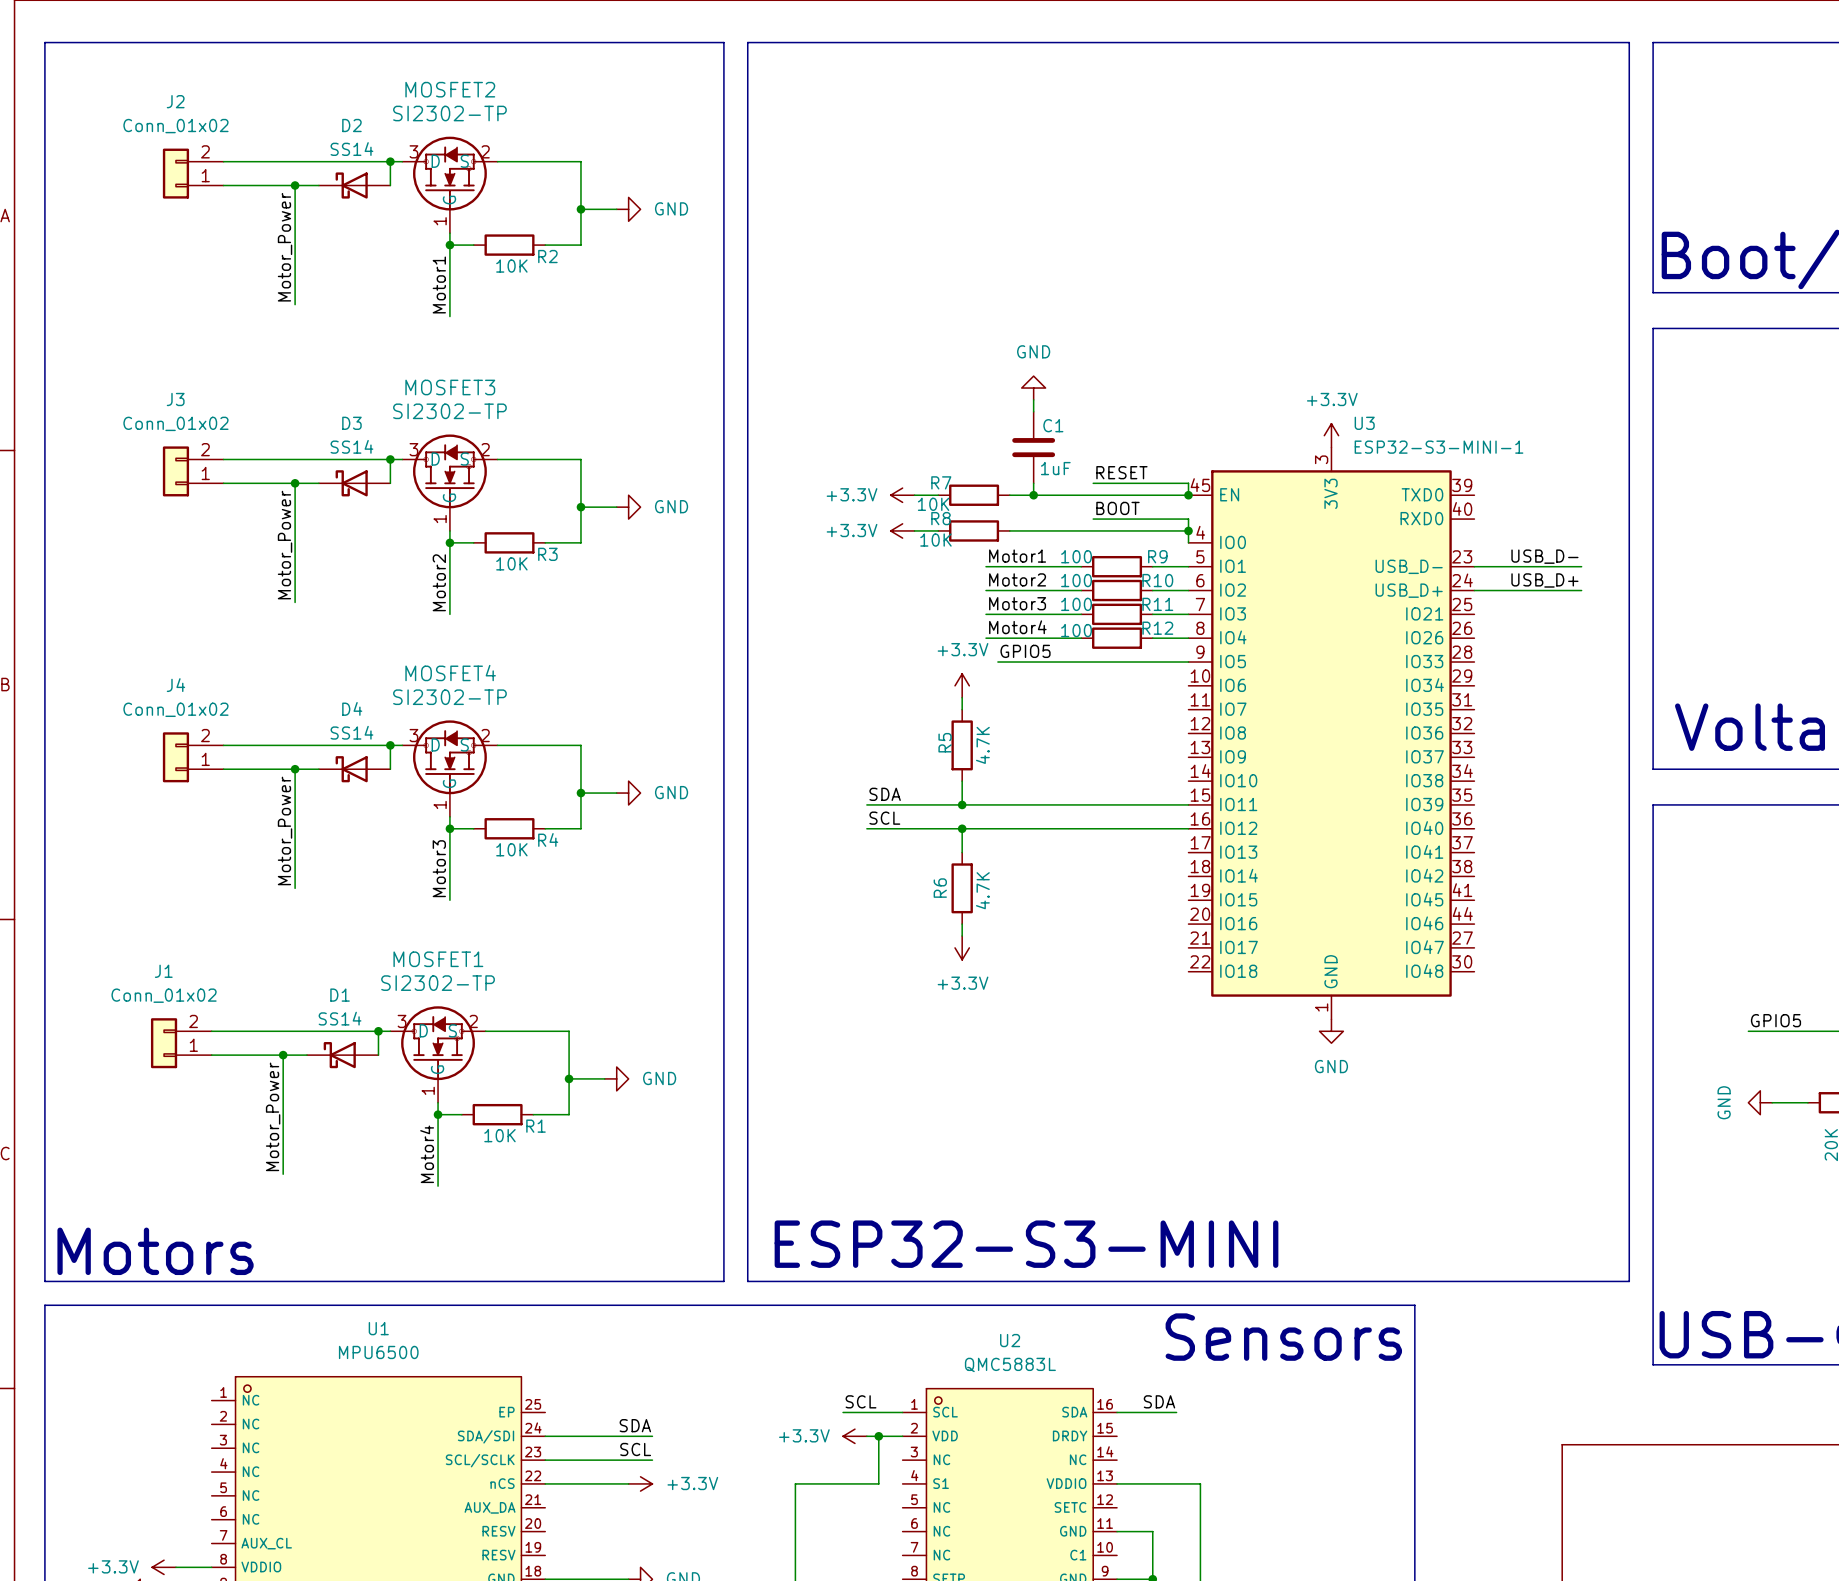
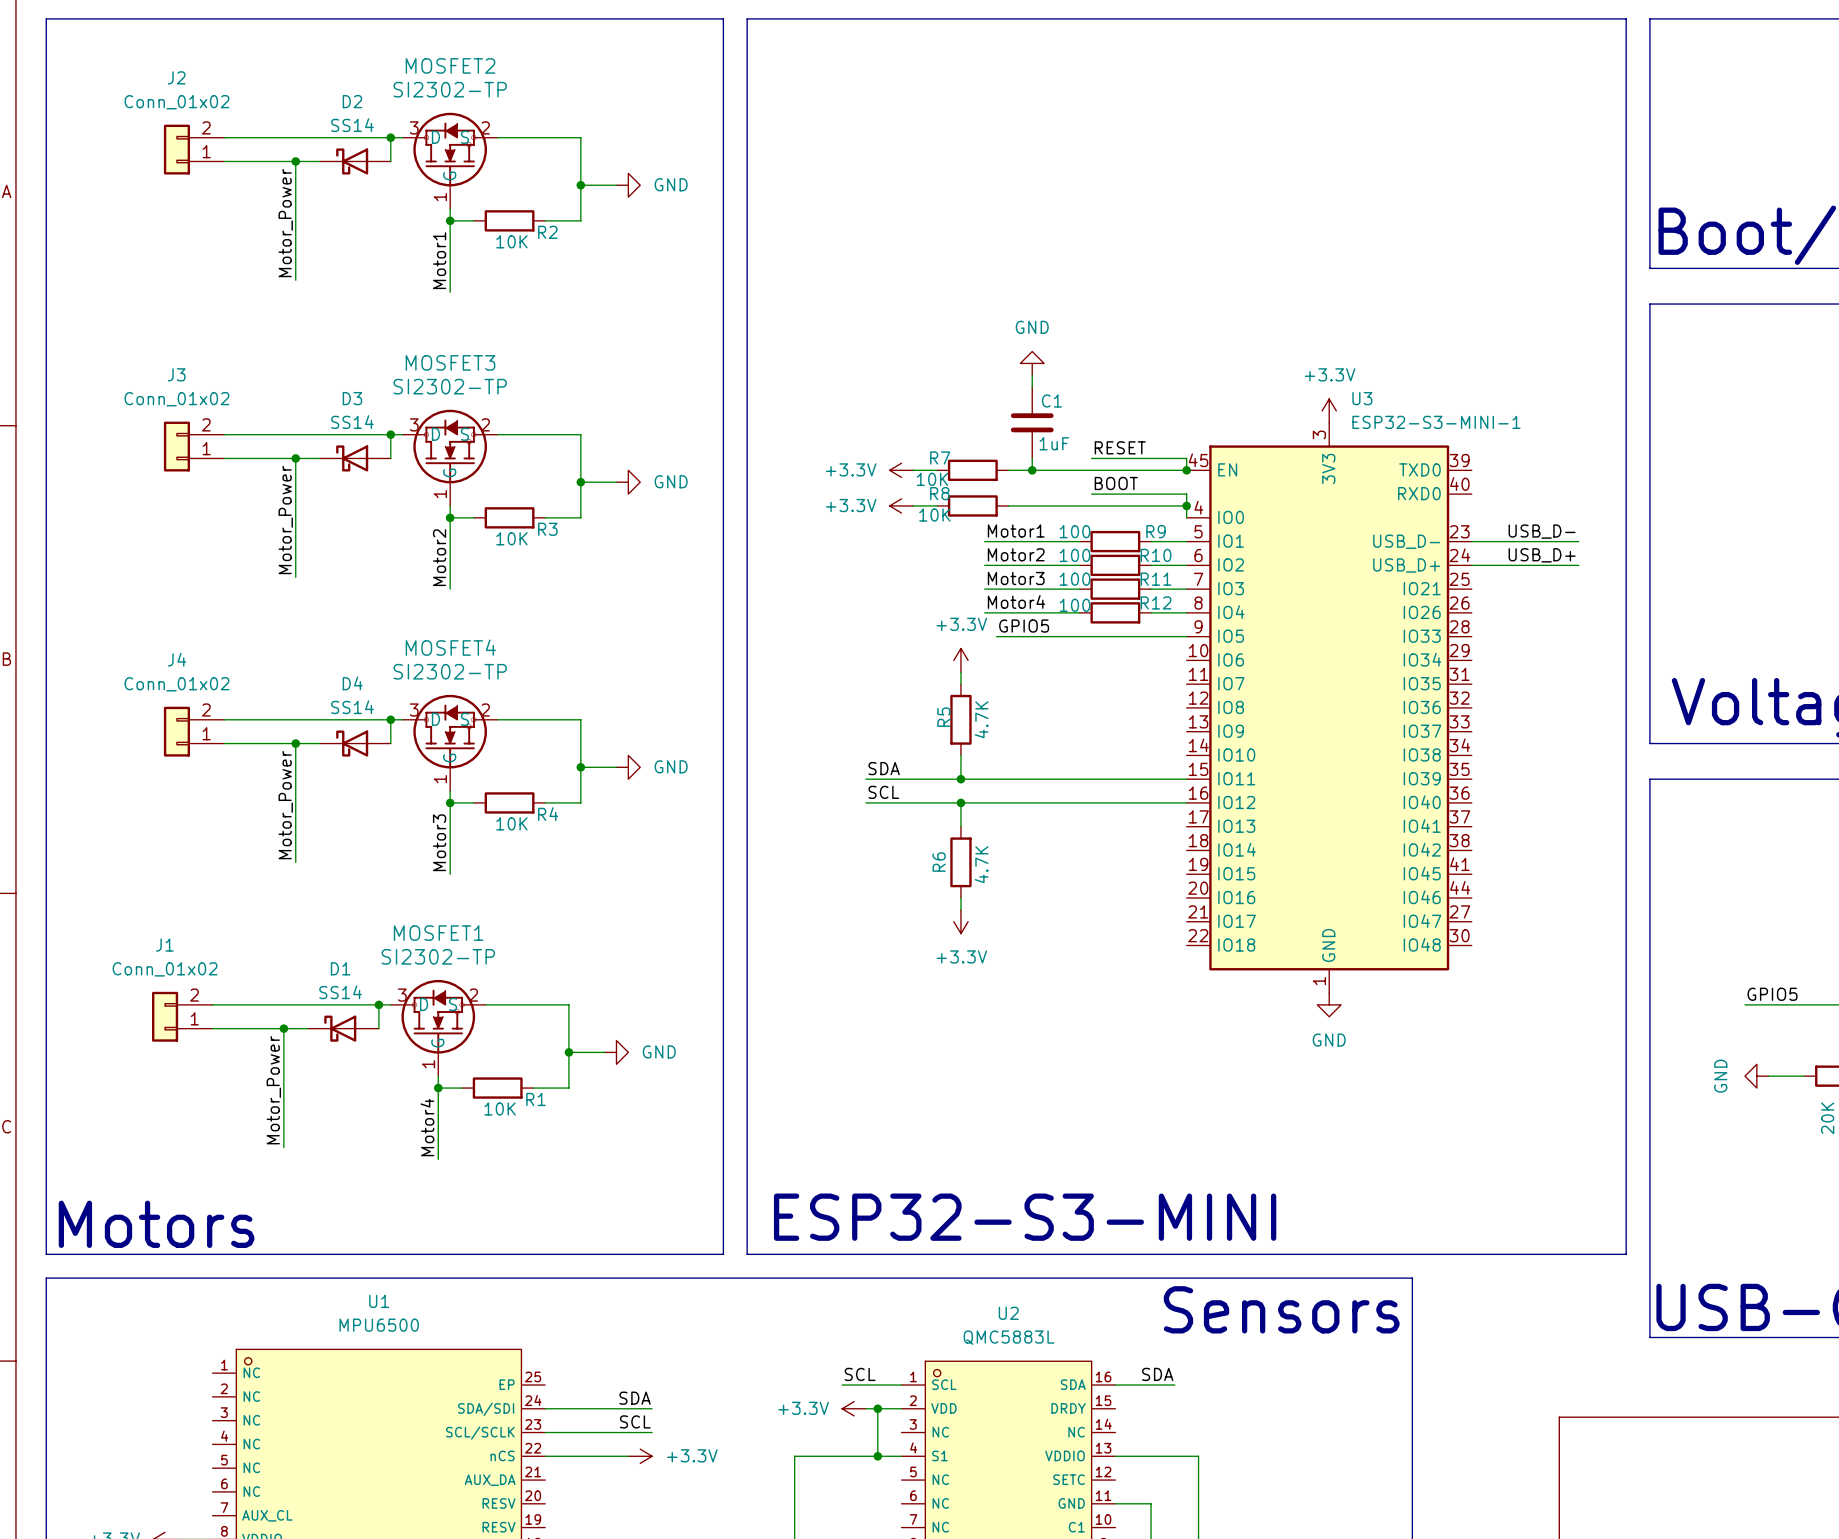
wire: none -> (877, 1456) (901, 1456)
junction: none -> (877, 1456)

